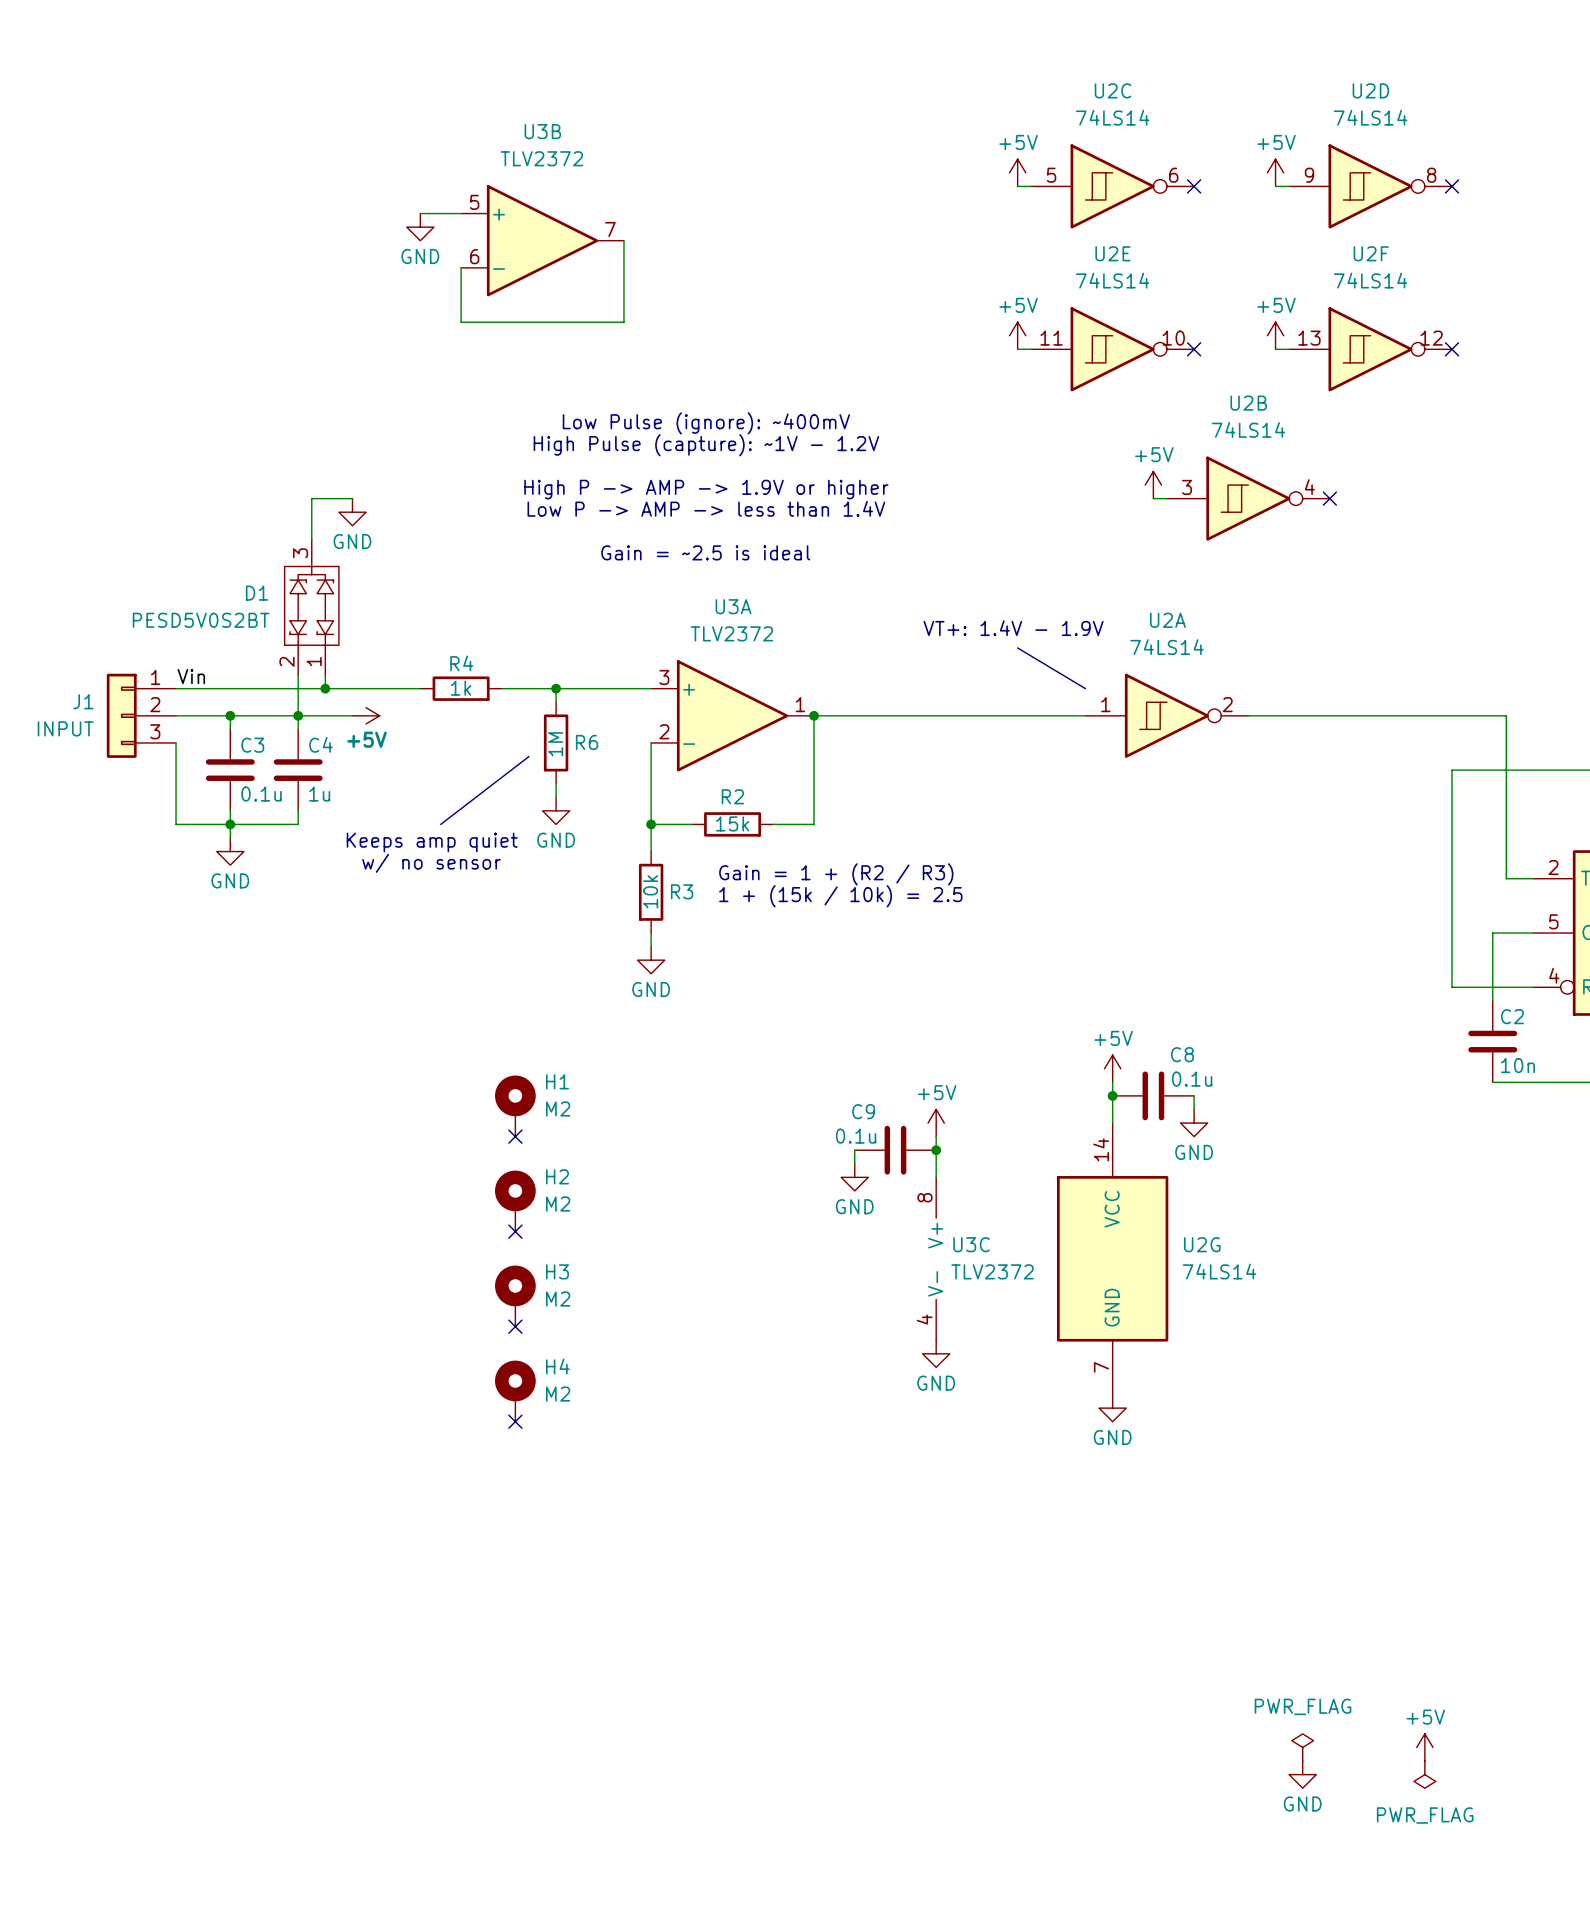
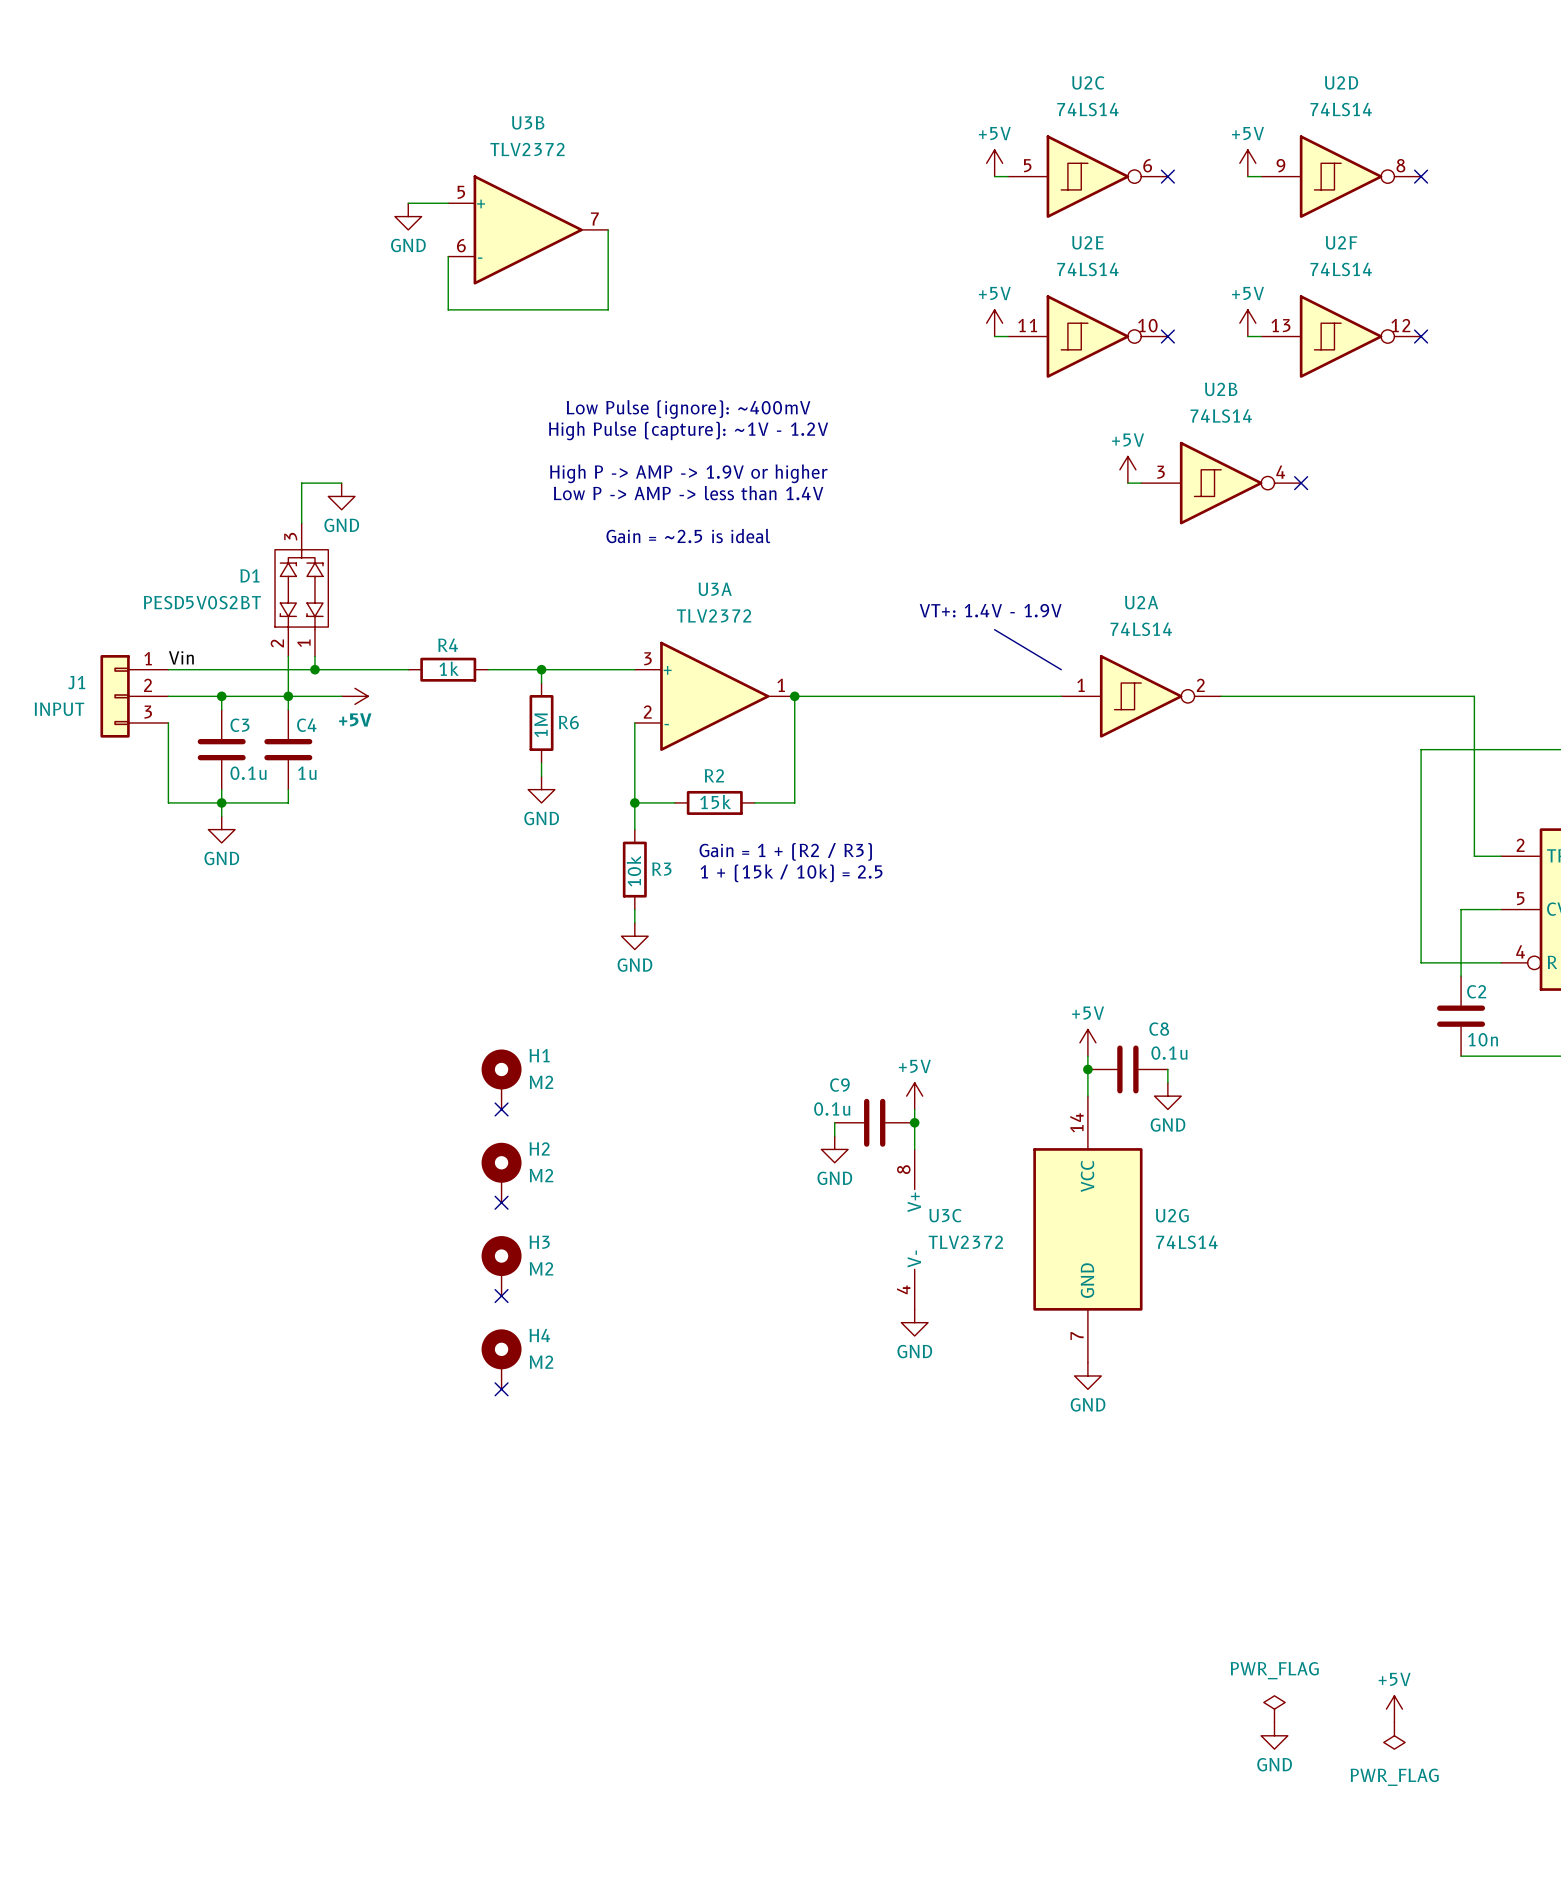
line: (528, 756) (440, 824) -> none
text: Keeps amp quiet (432, 842) -> none
text: w/ no sensor (431, 863) -> none

